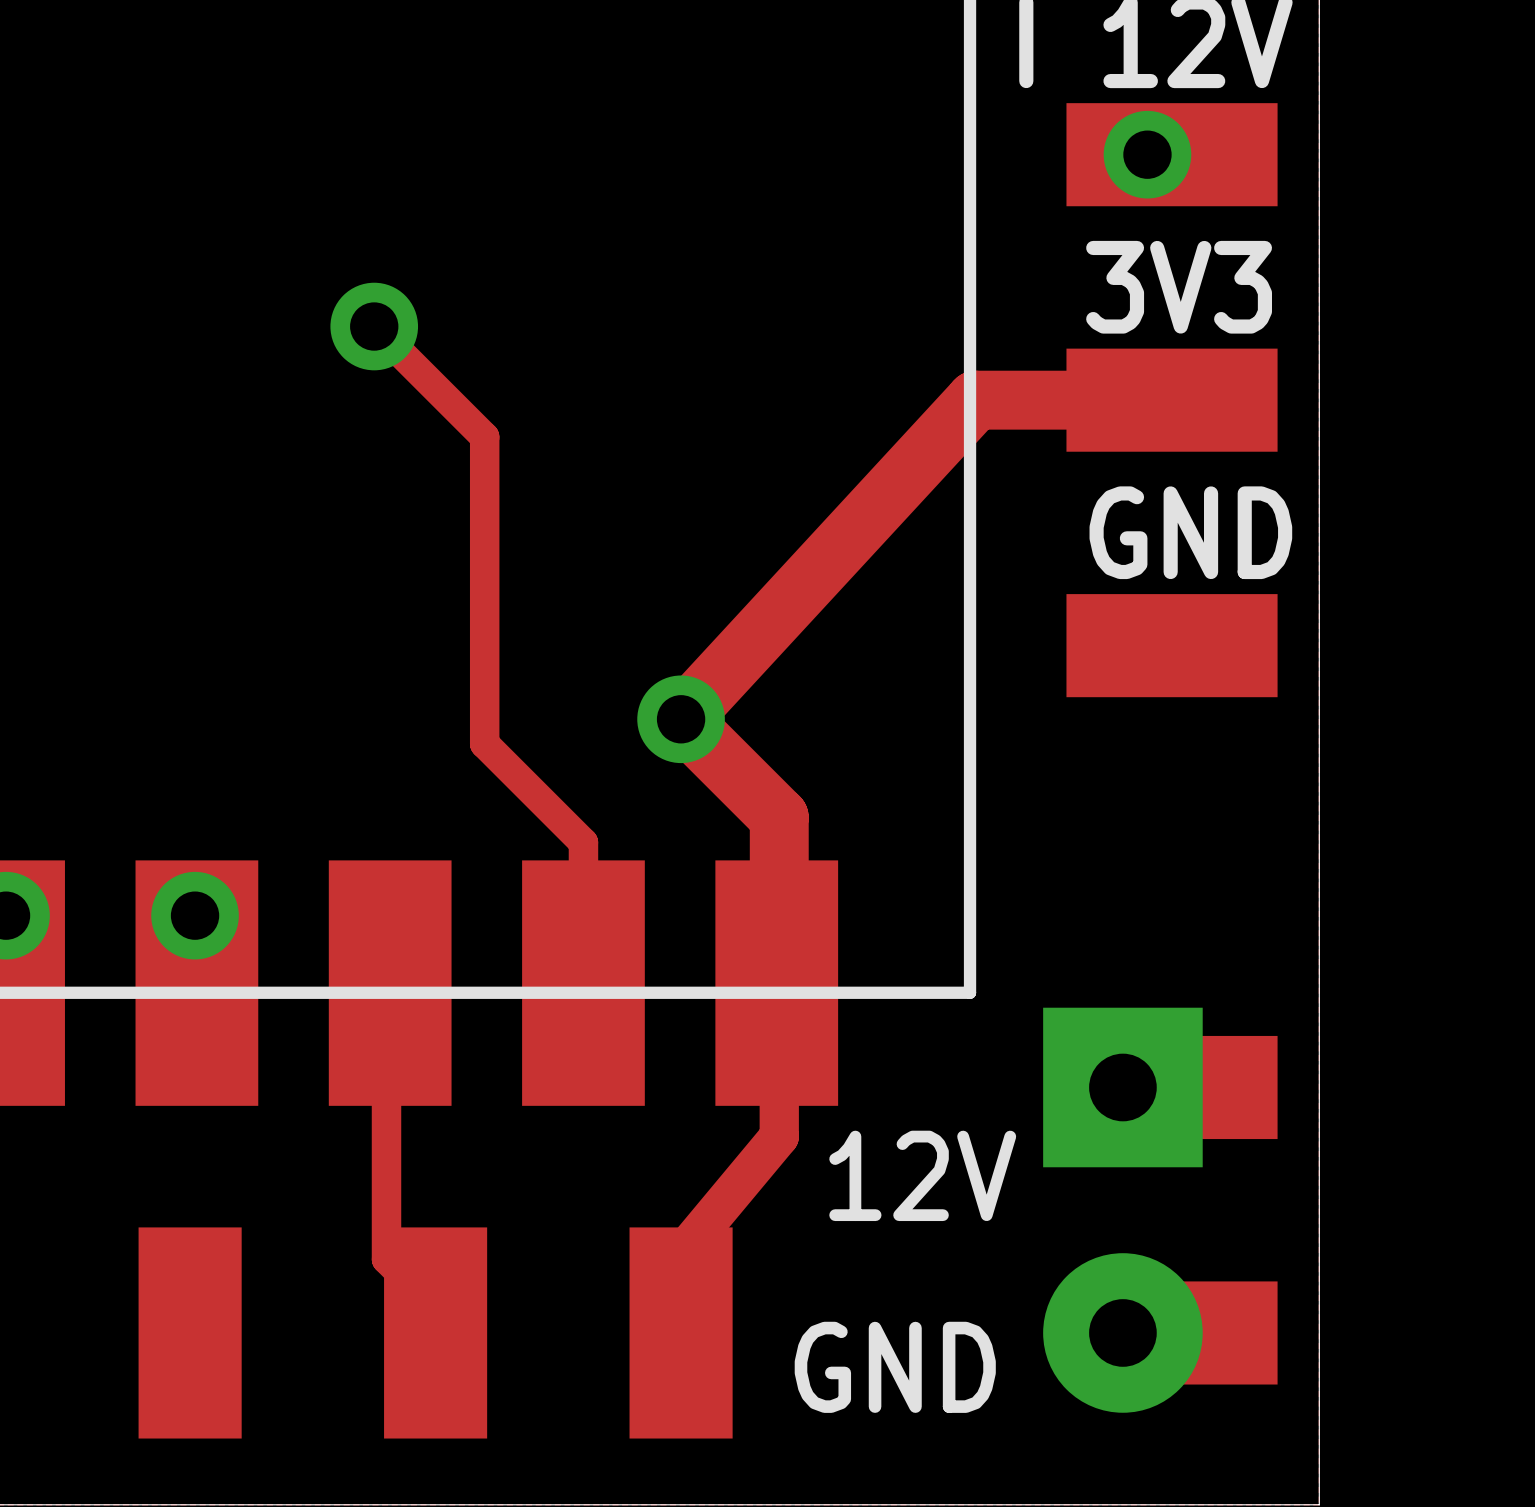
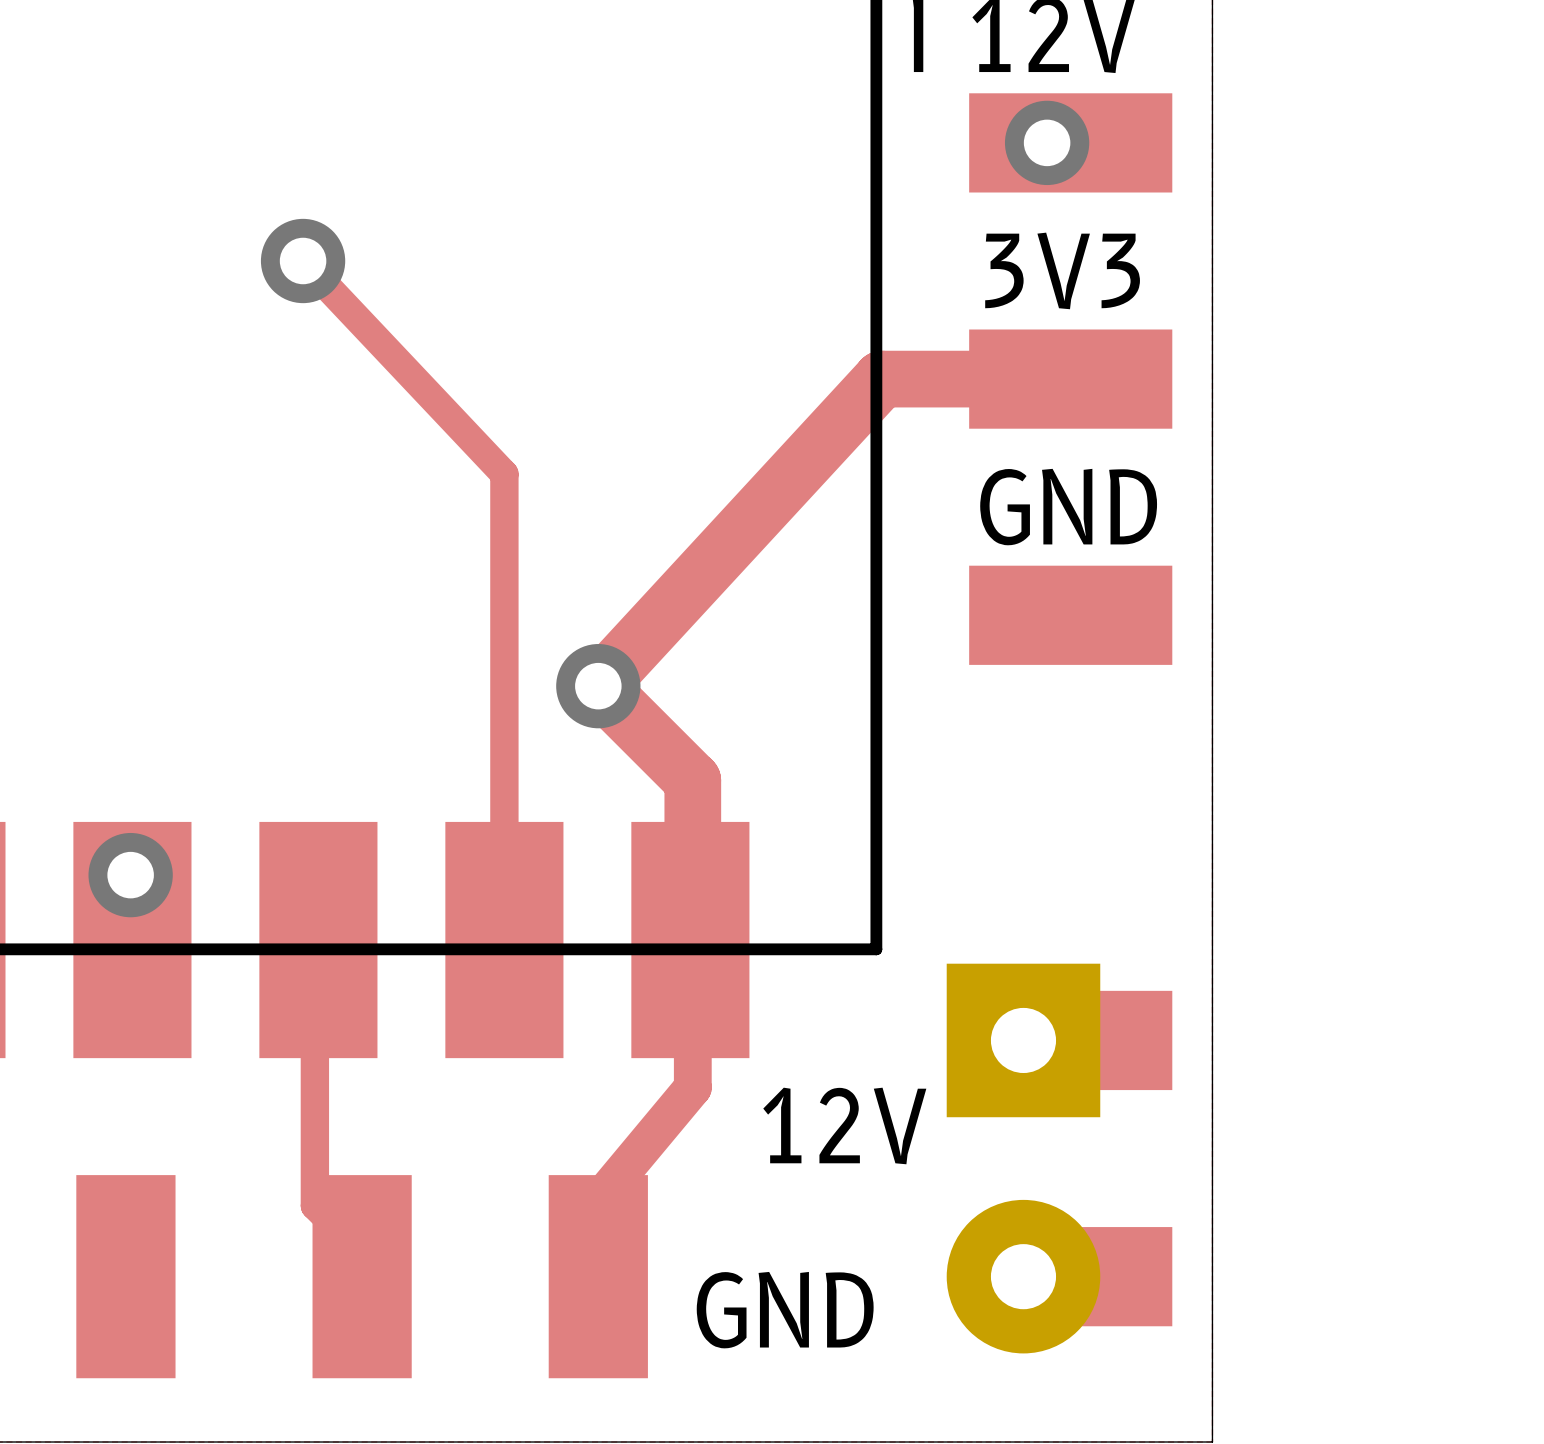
track: (374, 326) (484, 436) (484, 743) (583, 842) -> (303, 260) (504, 474) (504, 804)
via position: (374, 326) -> (303, 260)

